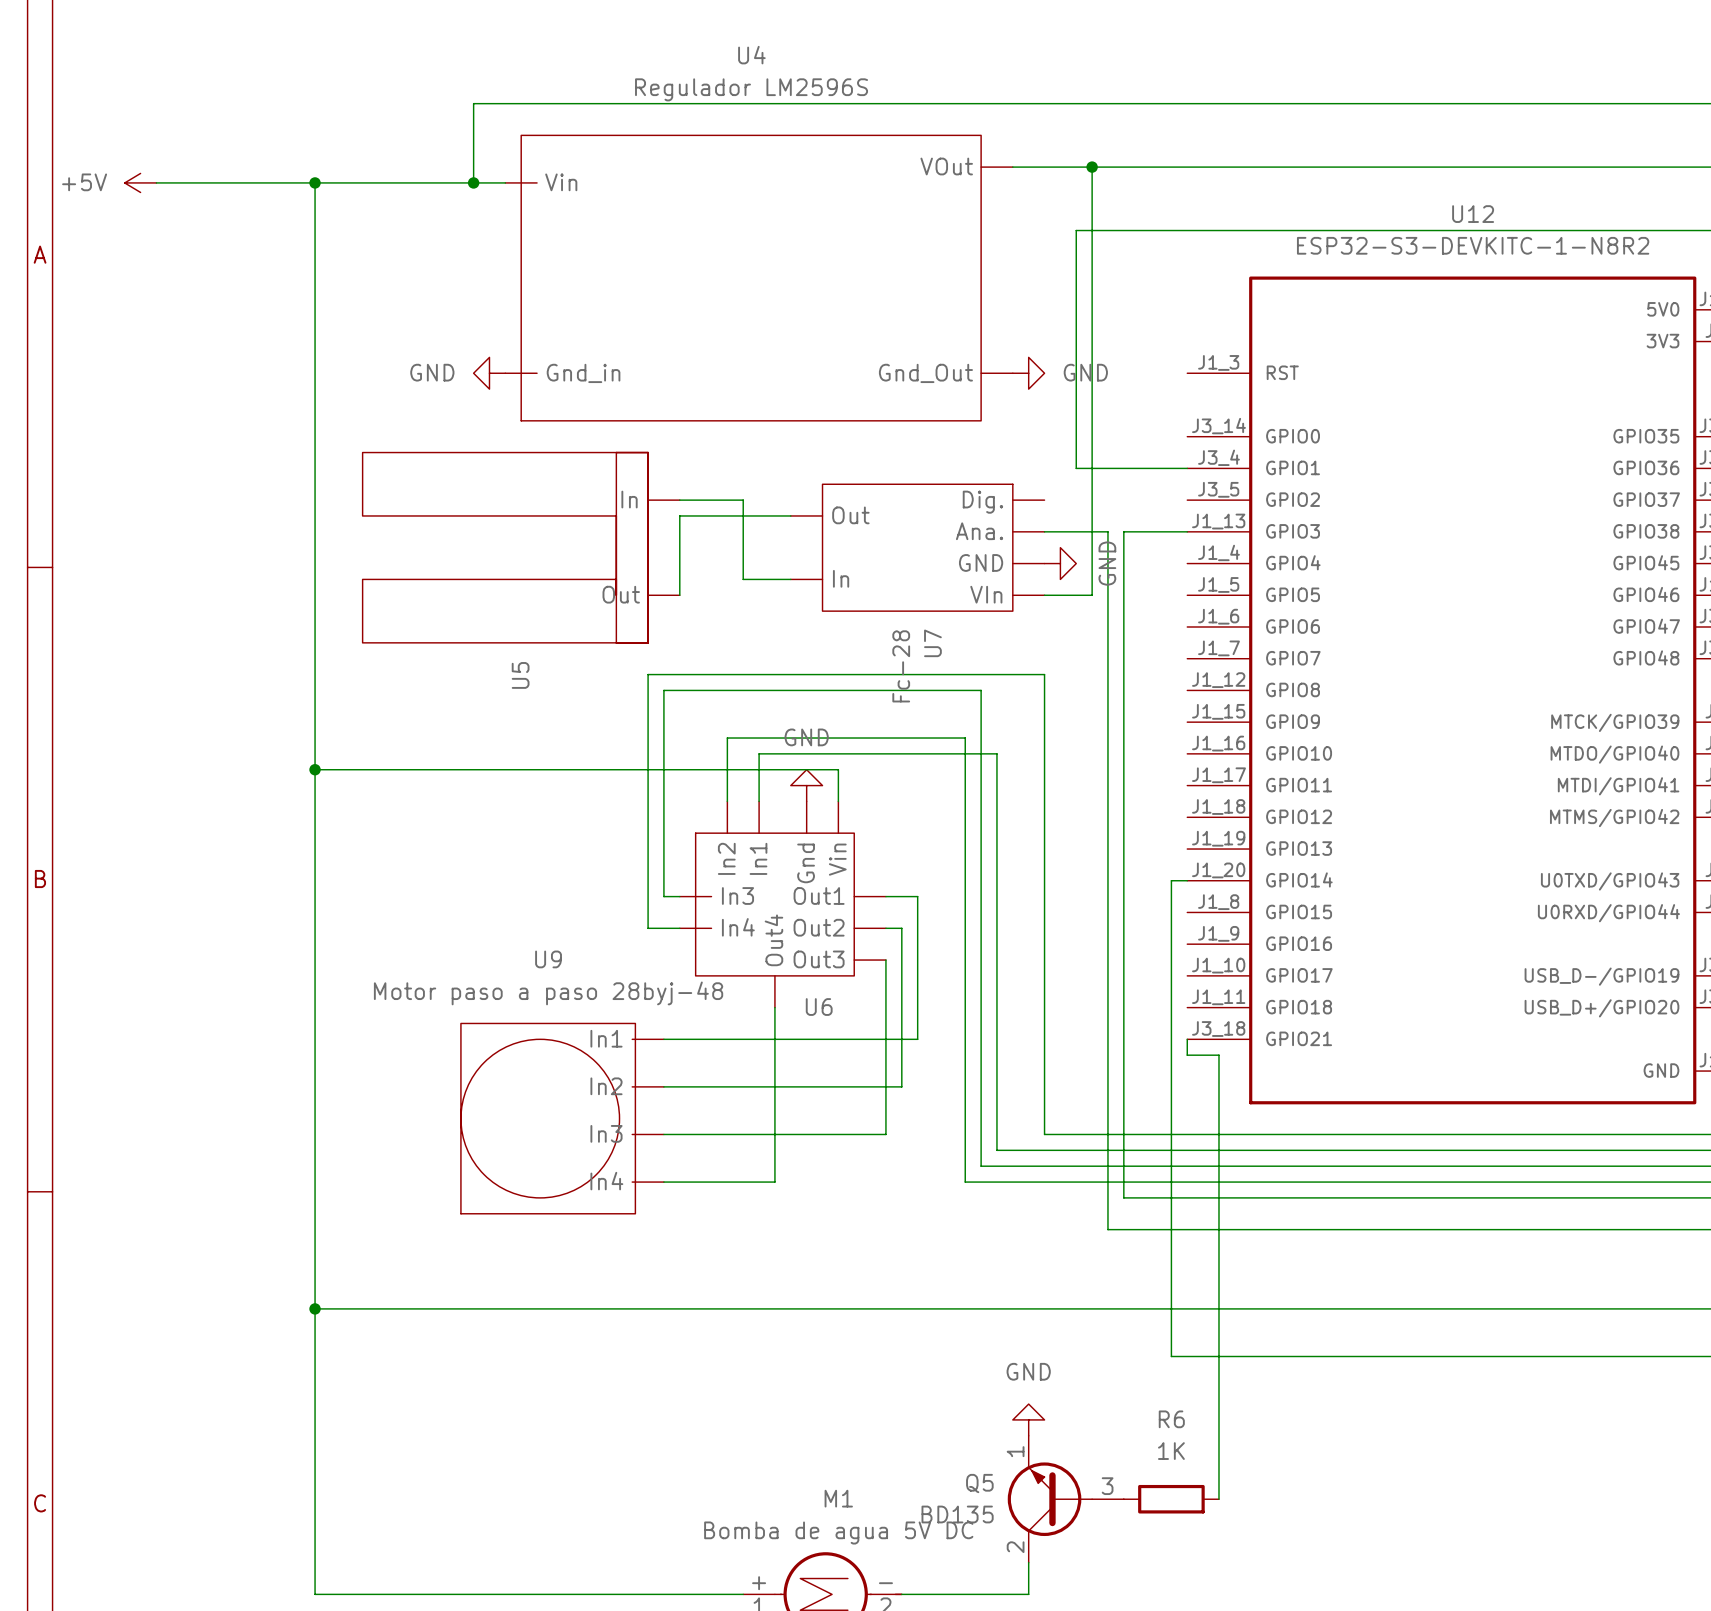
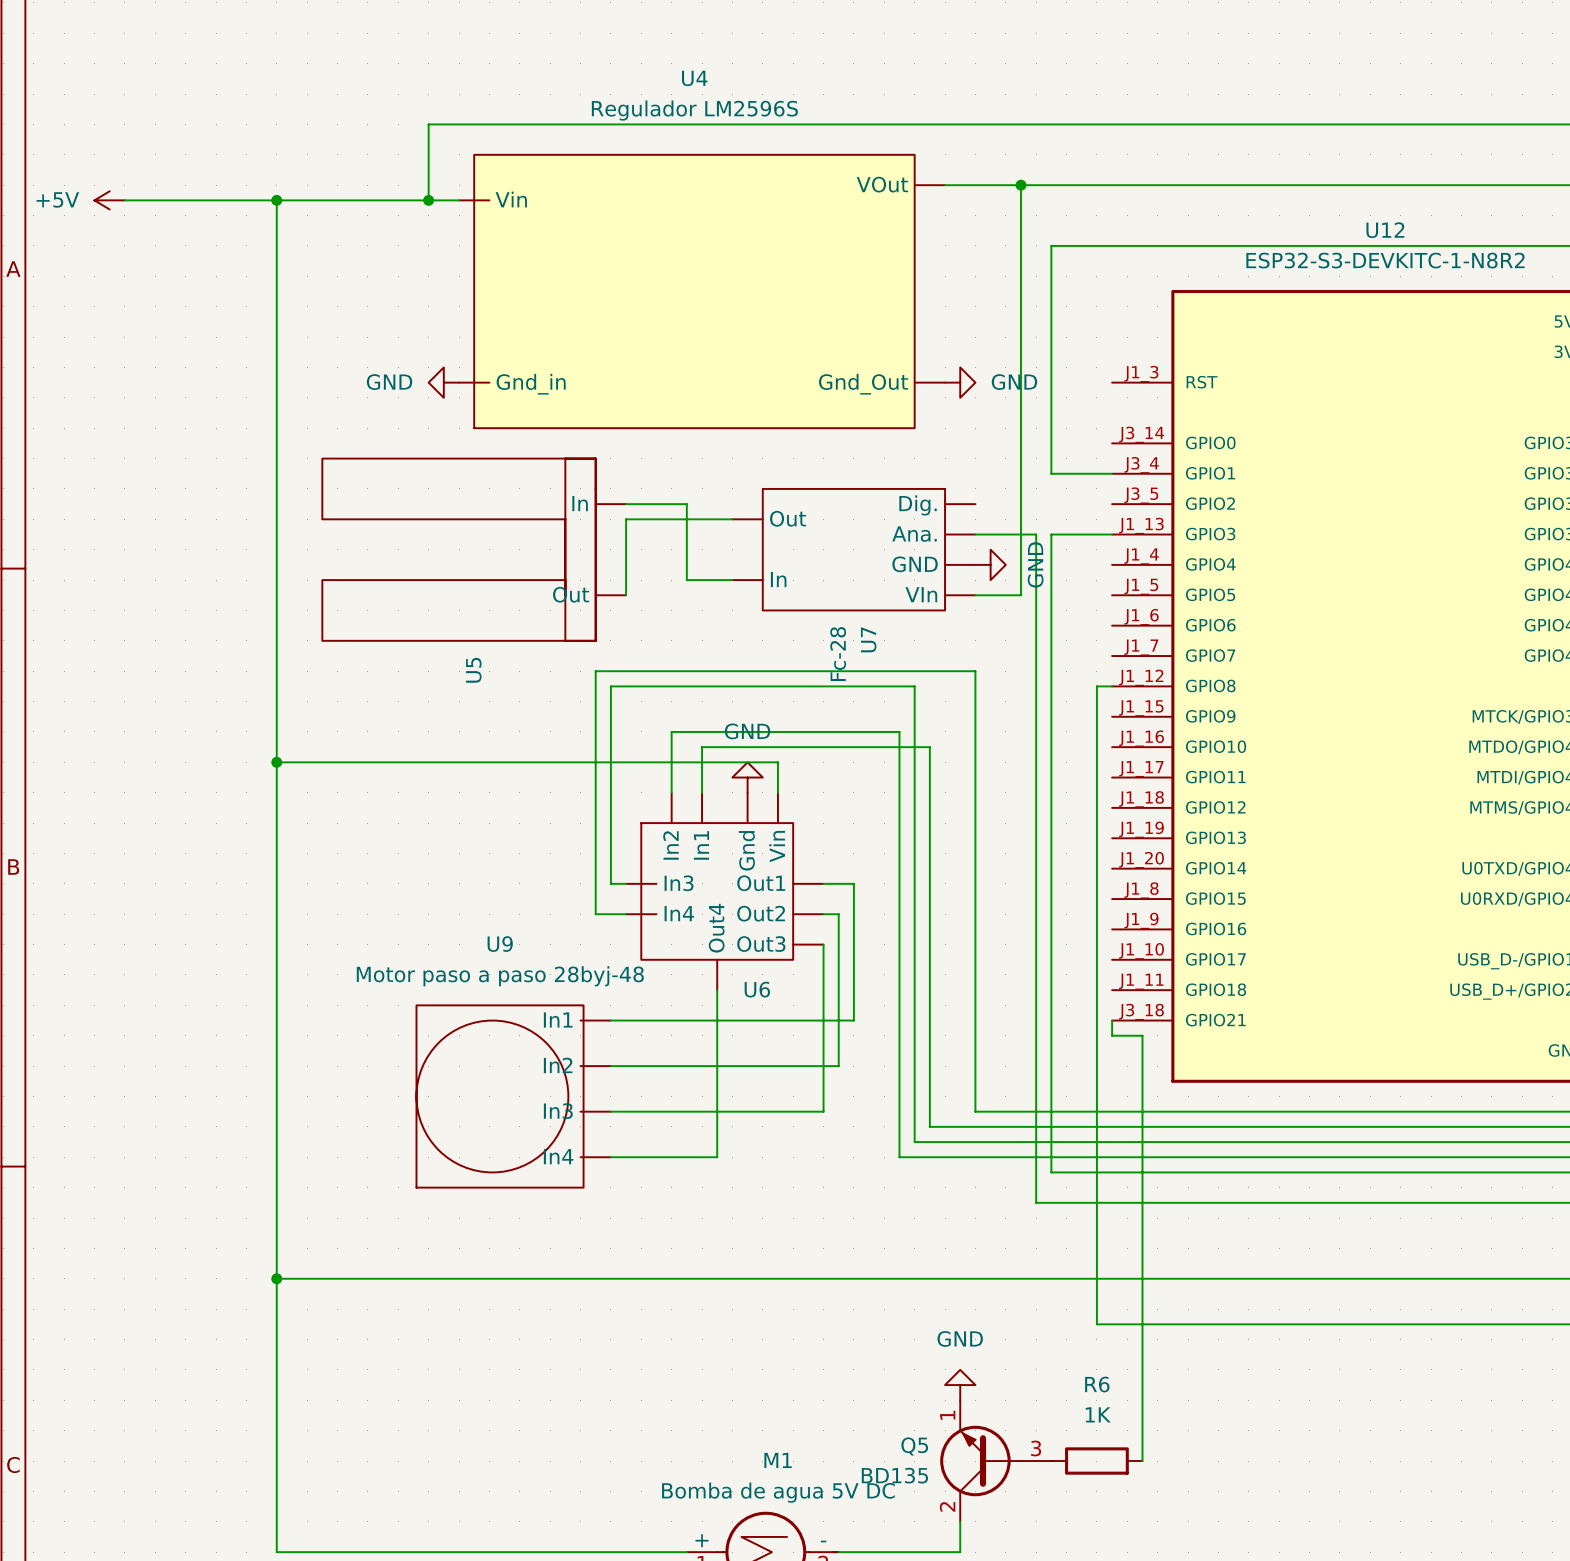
wire: (1123, 230) (1076, 230) (1076, 468) (1123, 468) -> (1051, 245) (1051, 473)
wire: (1171, 880) (1187, 880) -> (1096, 868) (1096, 686) (1112, 686)

